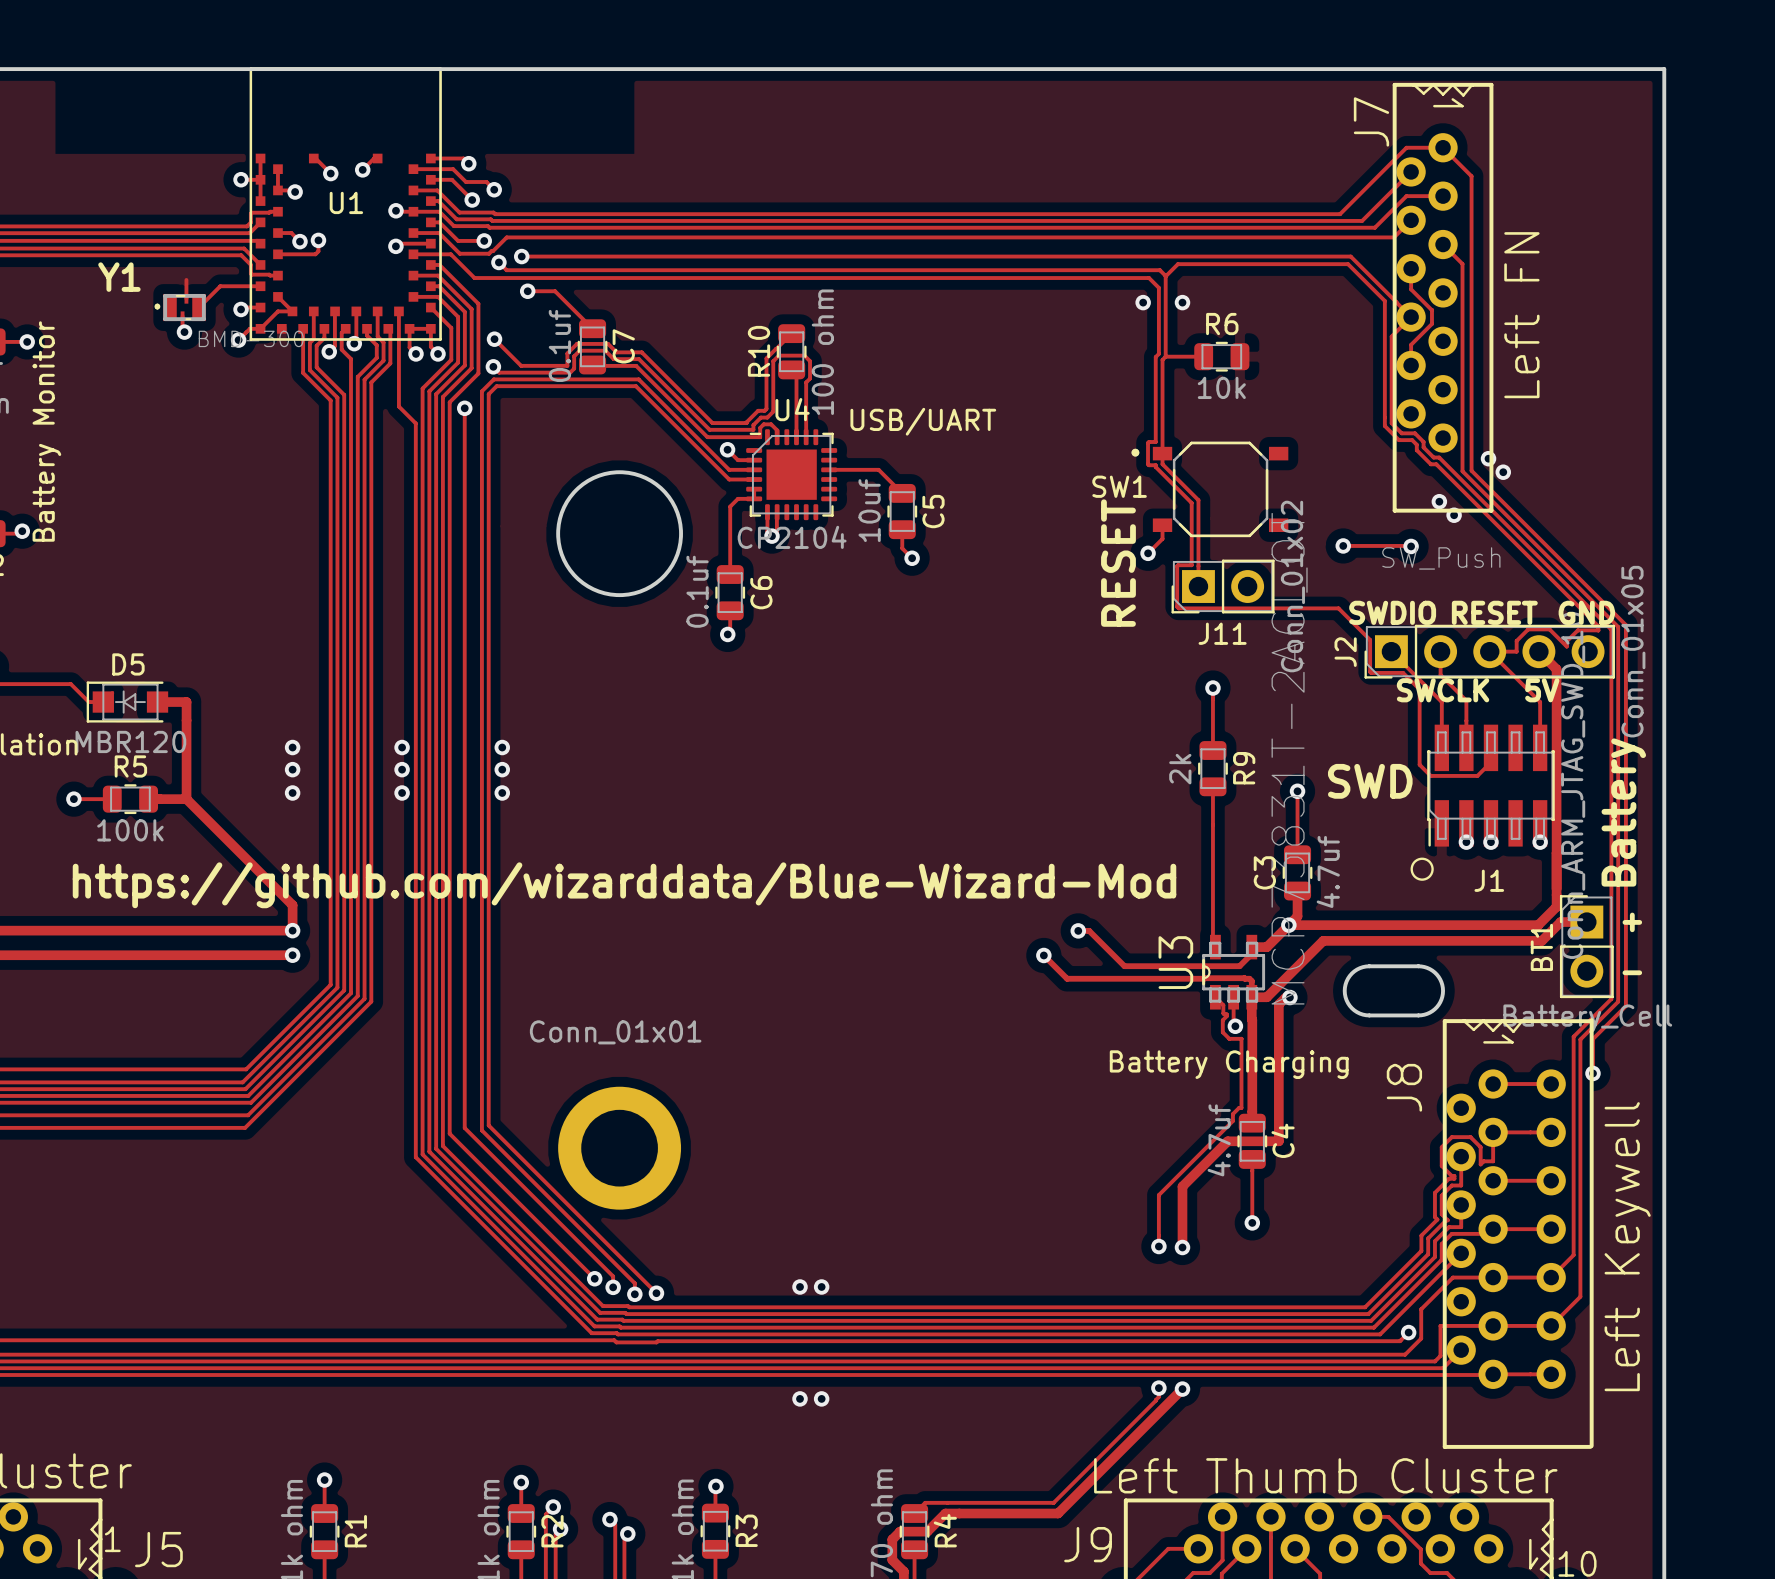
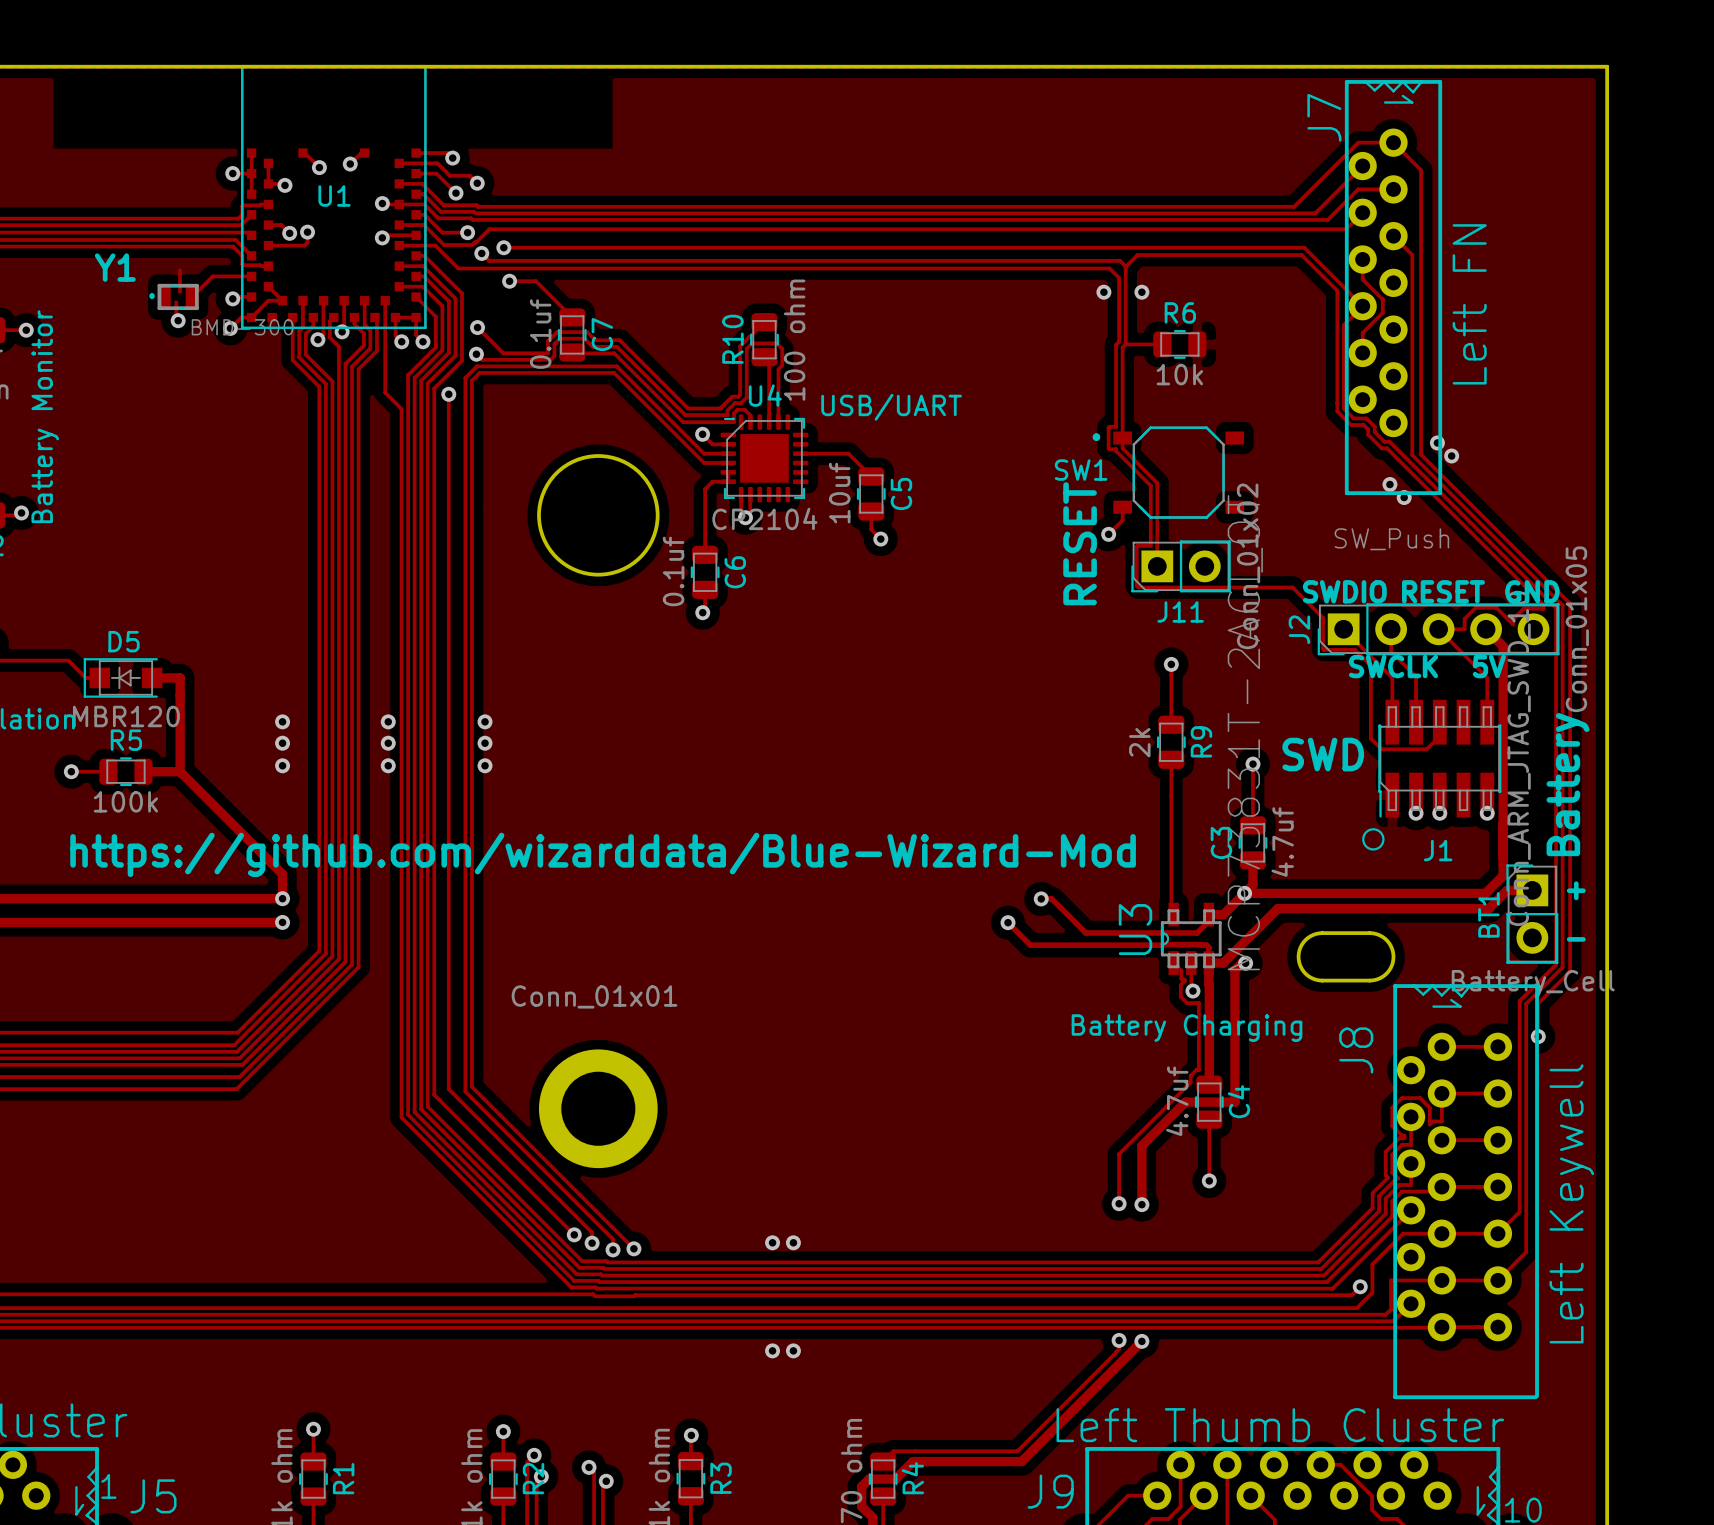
track: (1343, 545) (1411, 546) -> none
via: (1343, 545) -> none
via: (1411, 546) -> none

